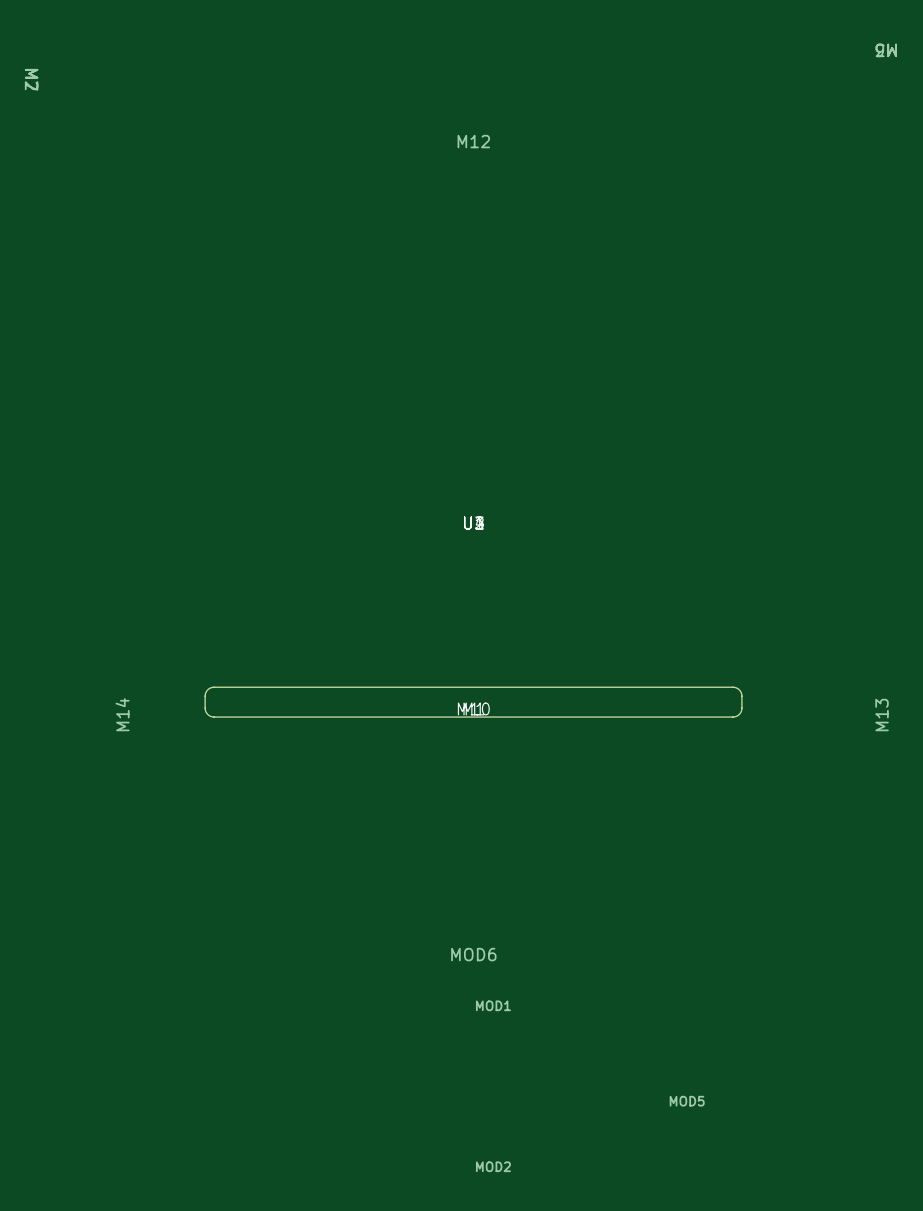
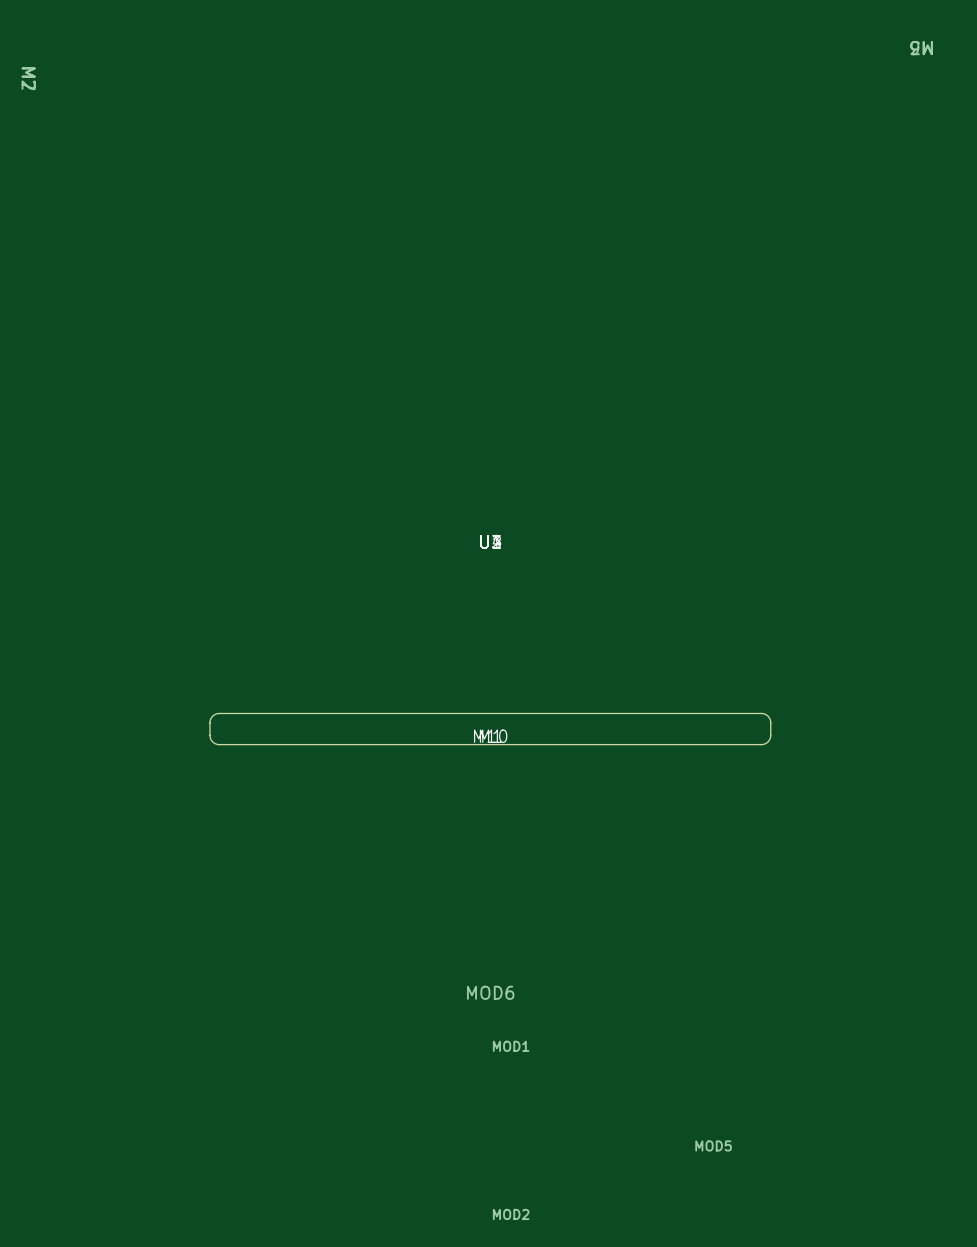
M12: (473, 141) -> none
M14: (122, 714) -> none
M13: (882, 715) -> none

